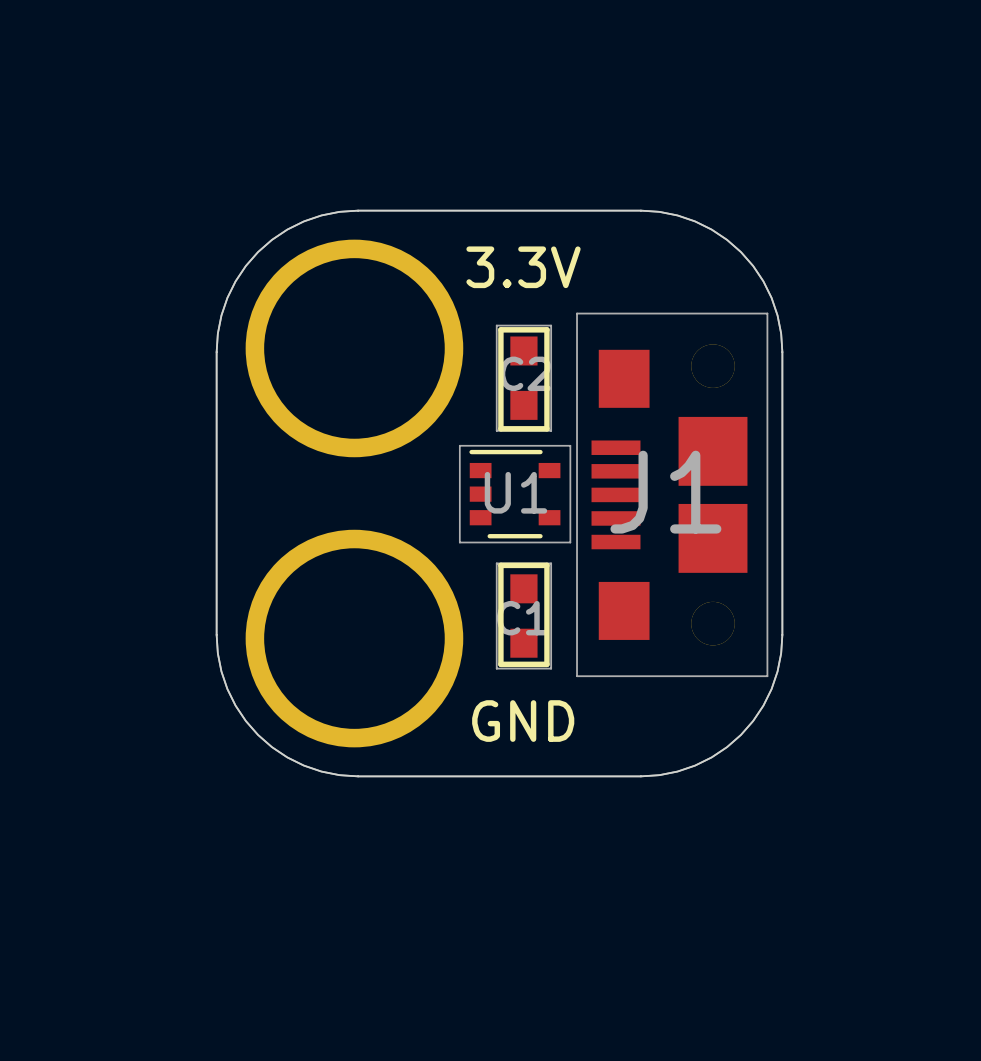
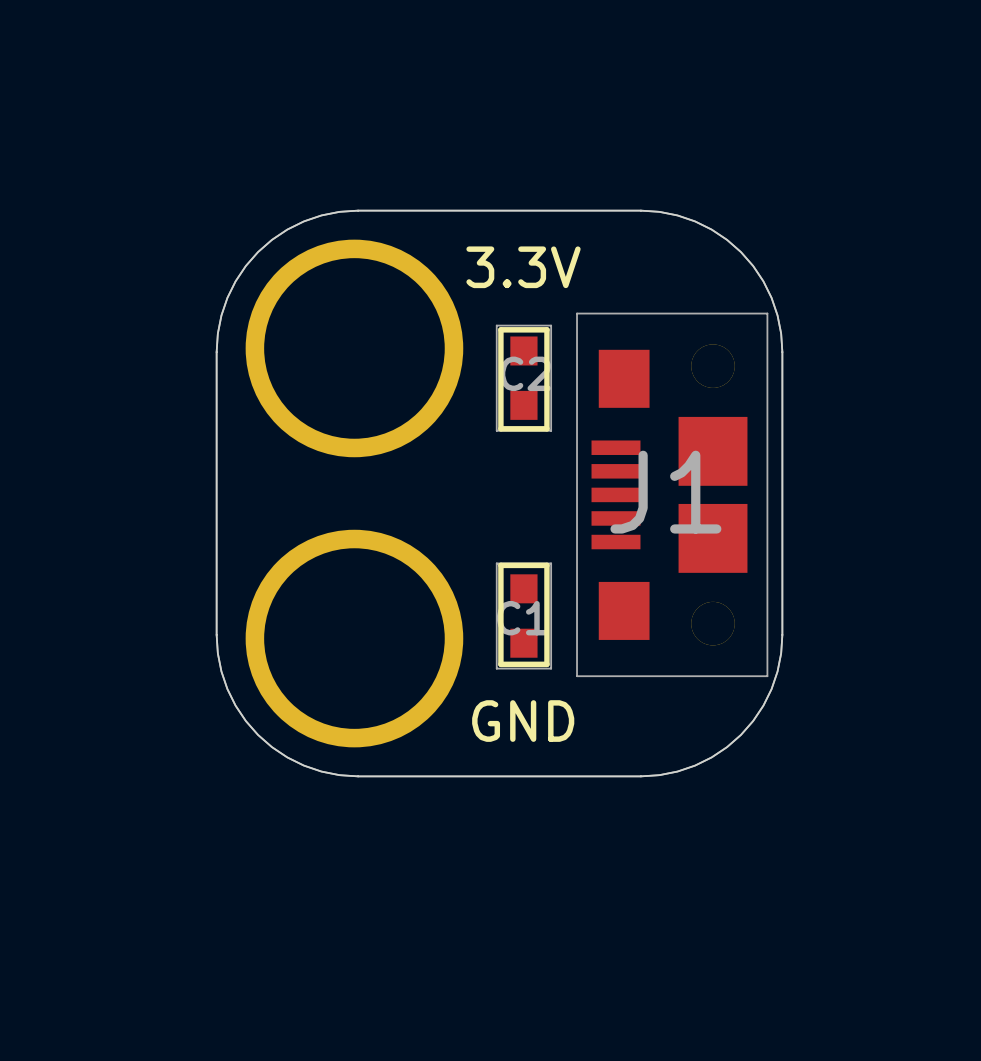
U1: (515, 494) -> none

